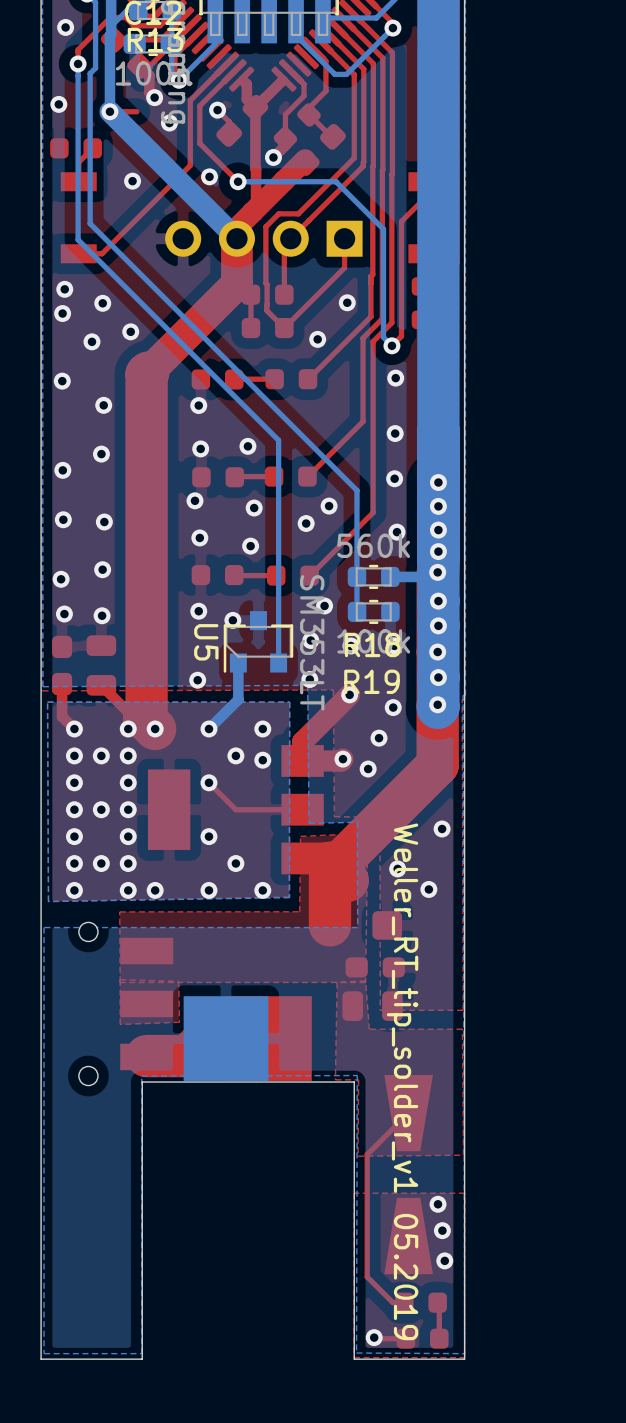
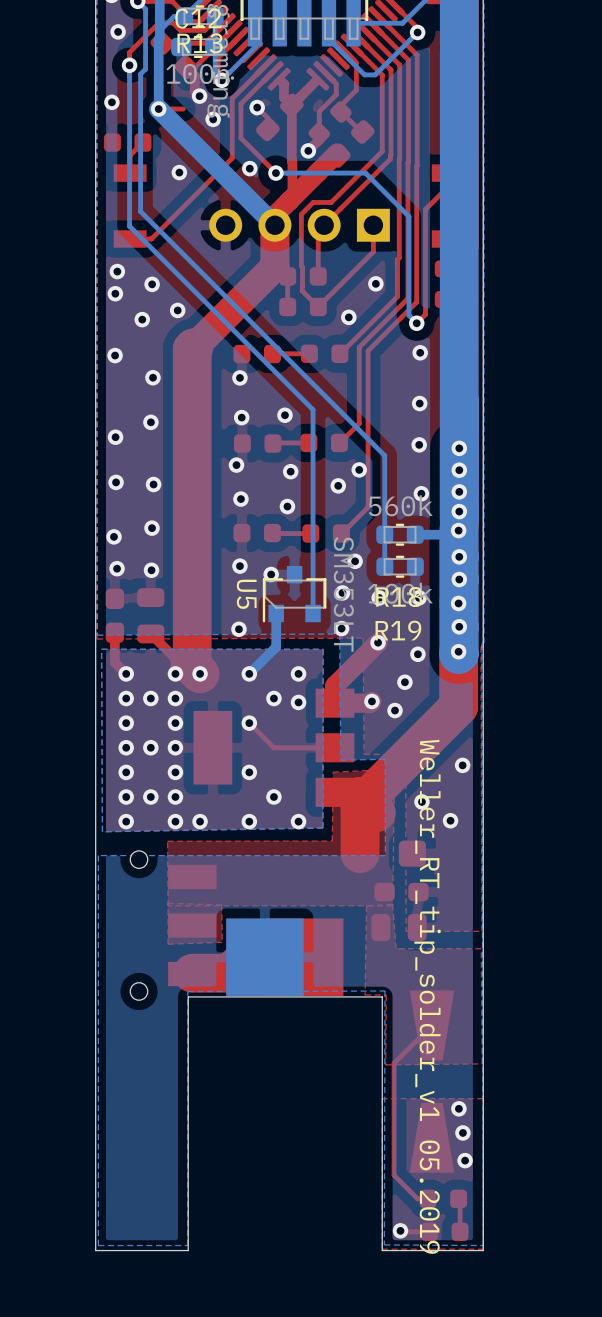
top track: (363, 338) (363, 421) (329, 455) -> (390, 316) (359, 347) (359, 423)
top track: (373, 341) (373, 512) (338, 546) -> (399, 319) (368, 350) (368, 507)

